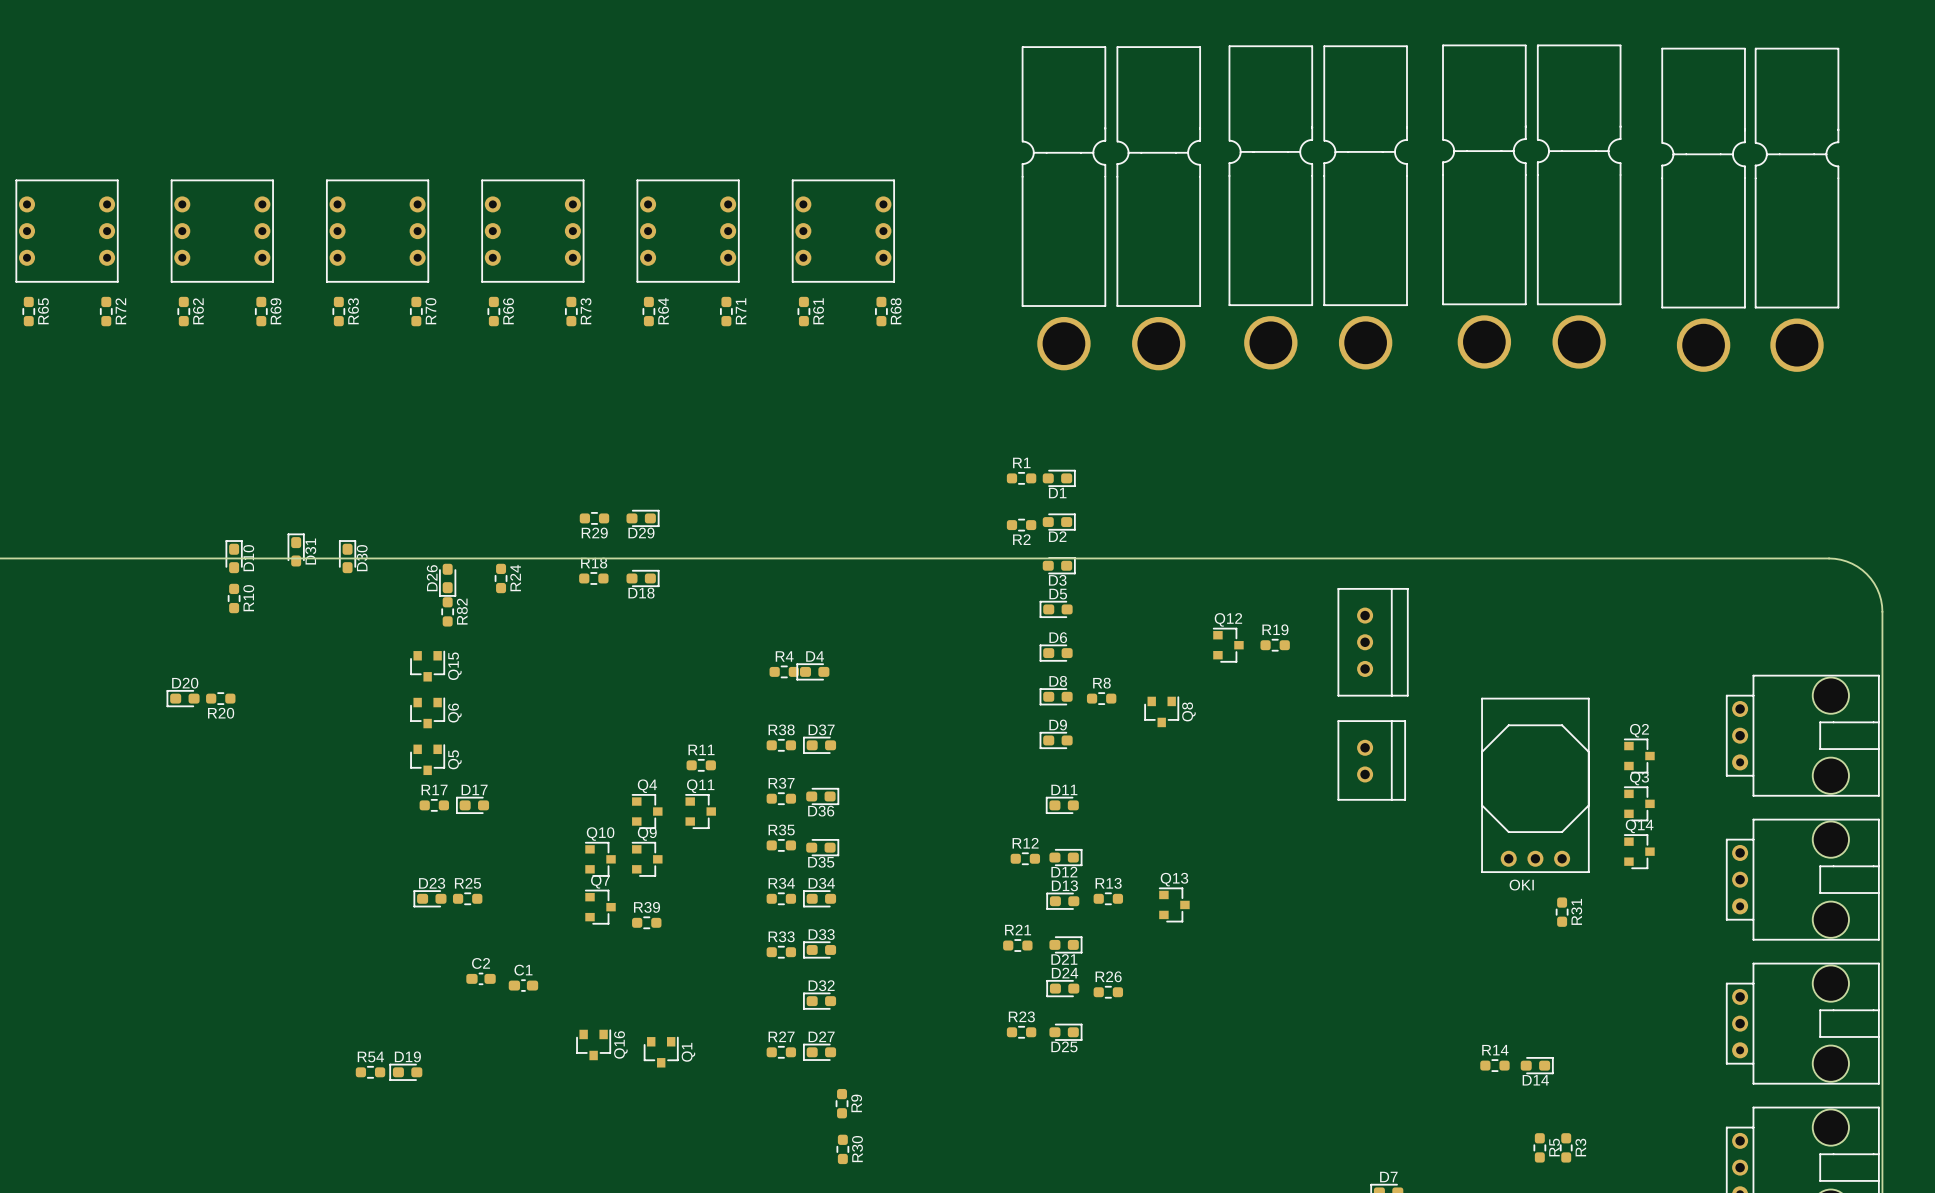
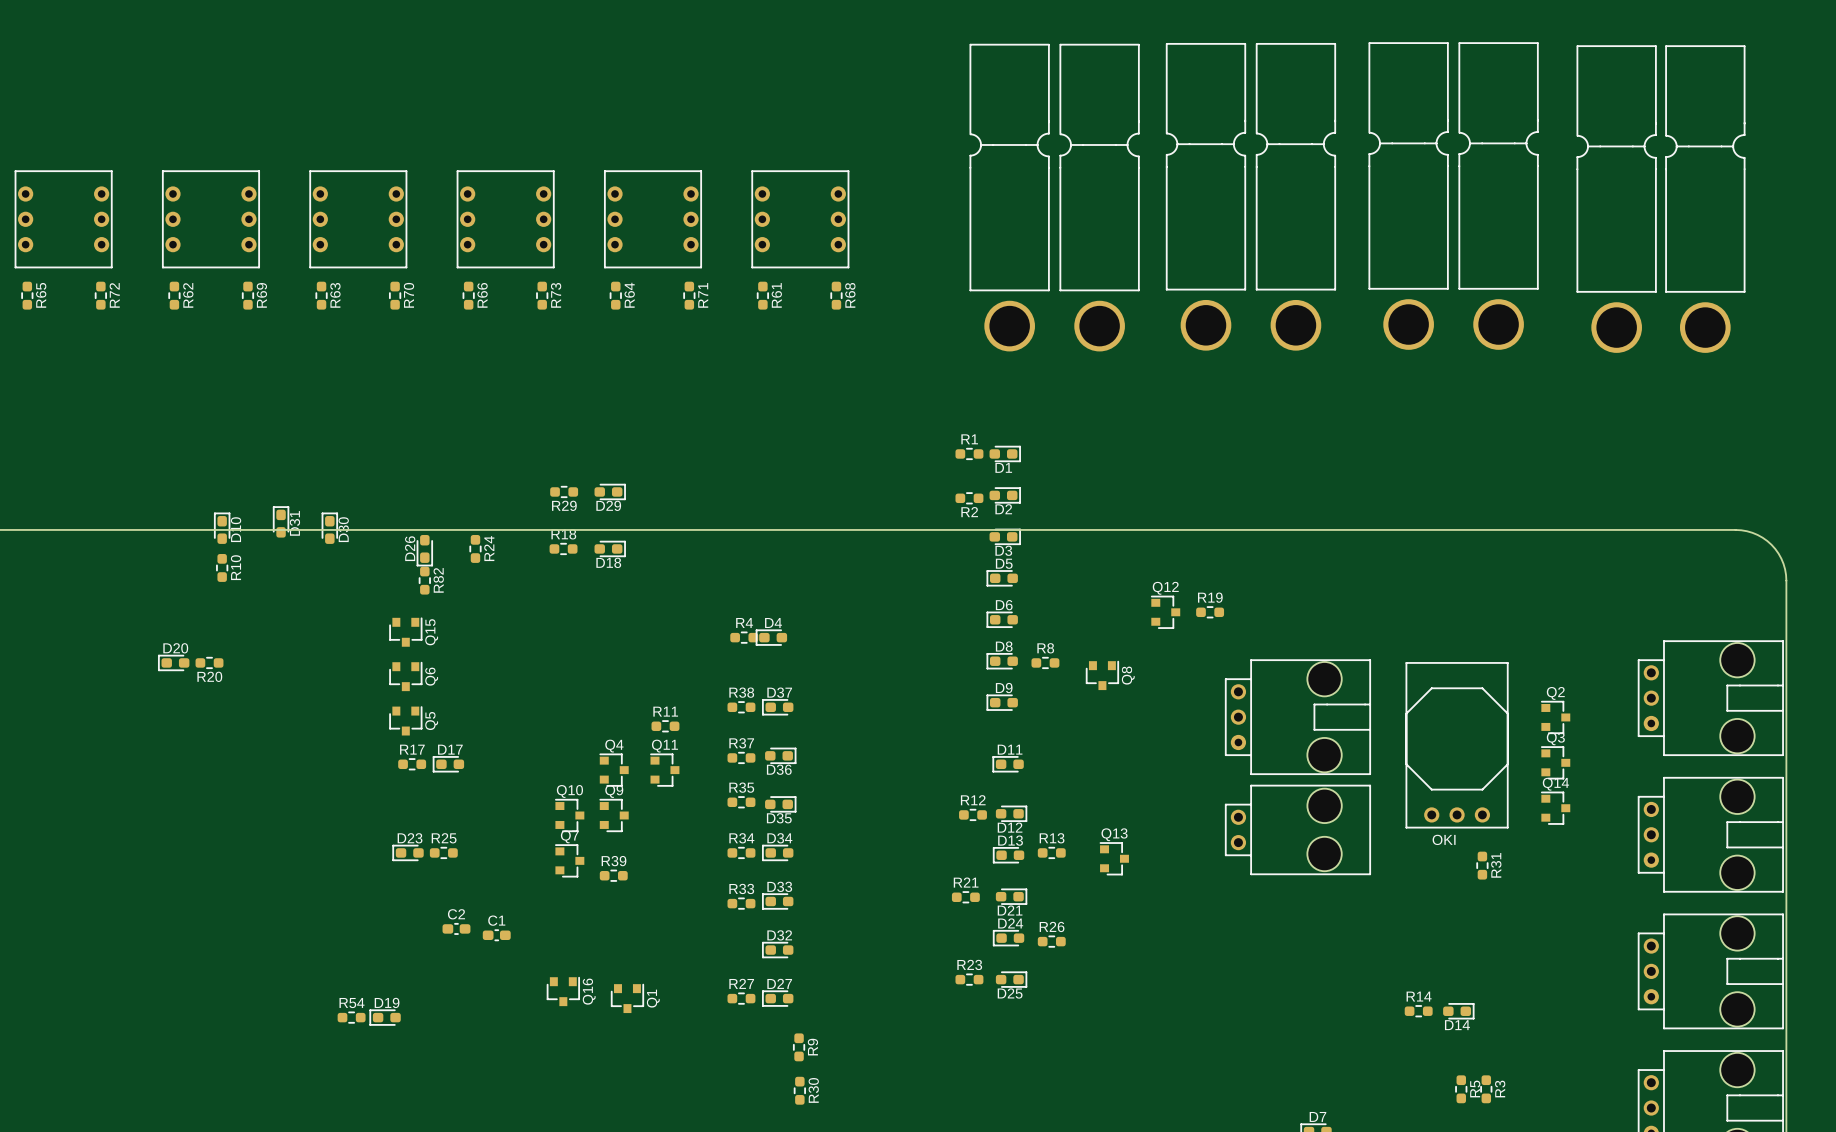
part: (1373, 642) -> none
part footprint: [1337, 720, 1406, 801] -> [1225, 659, 1371, 775]
part: none -> (1297, 829)

